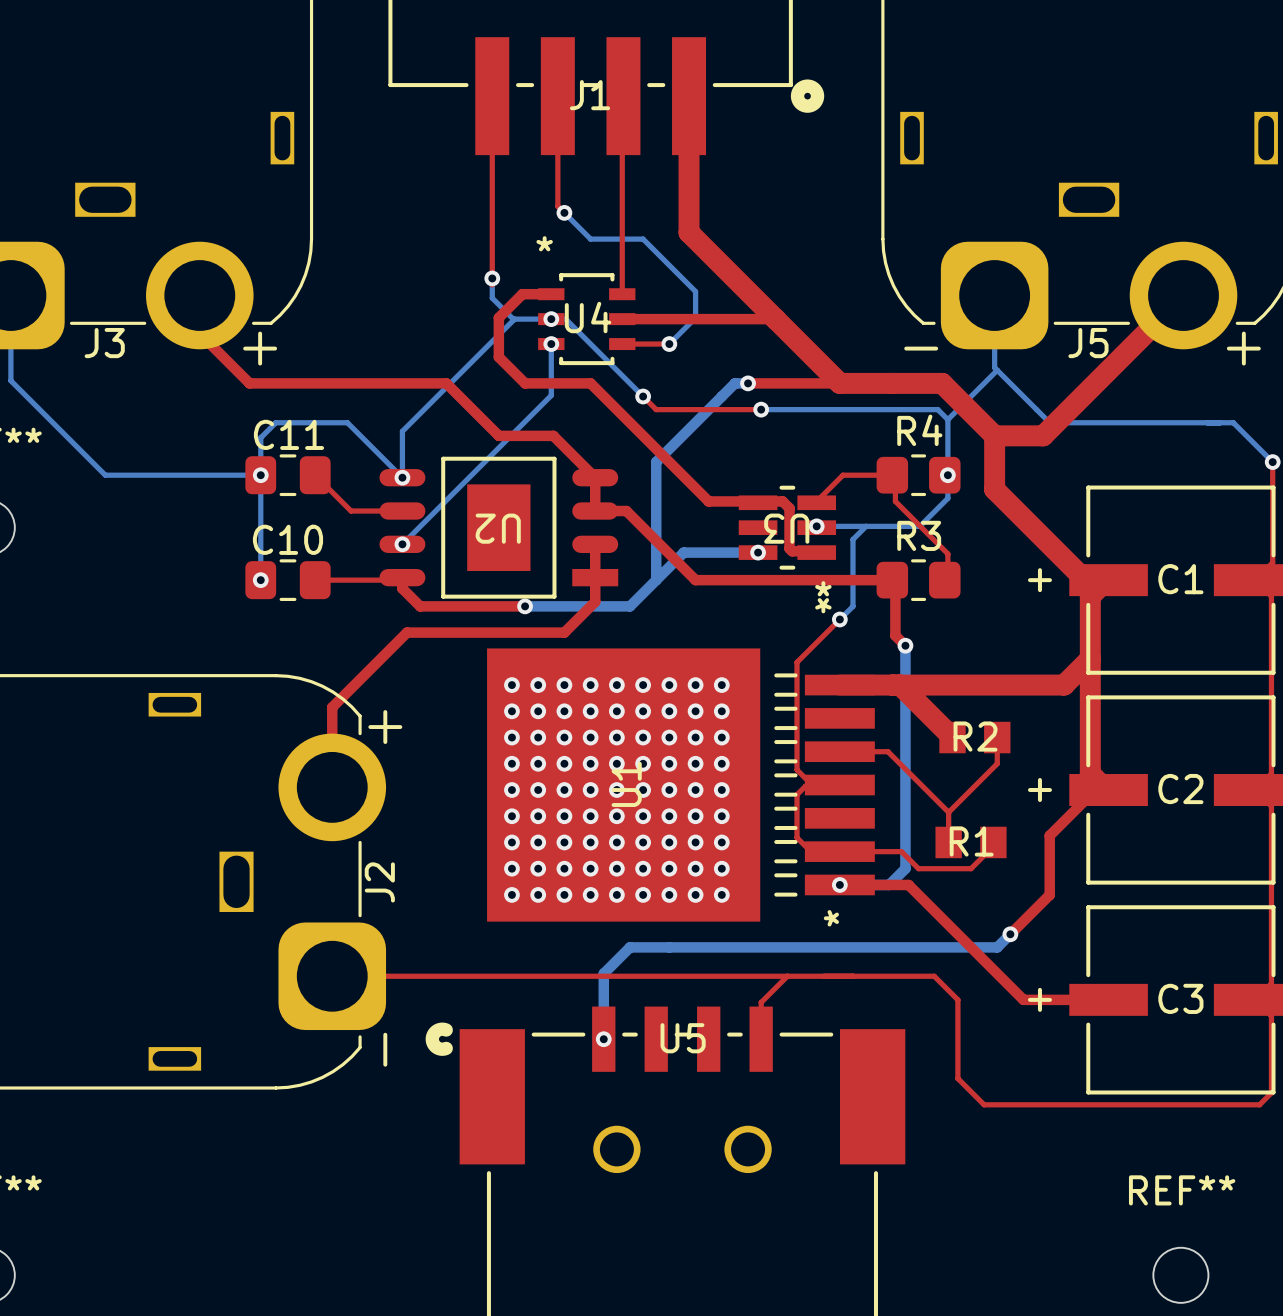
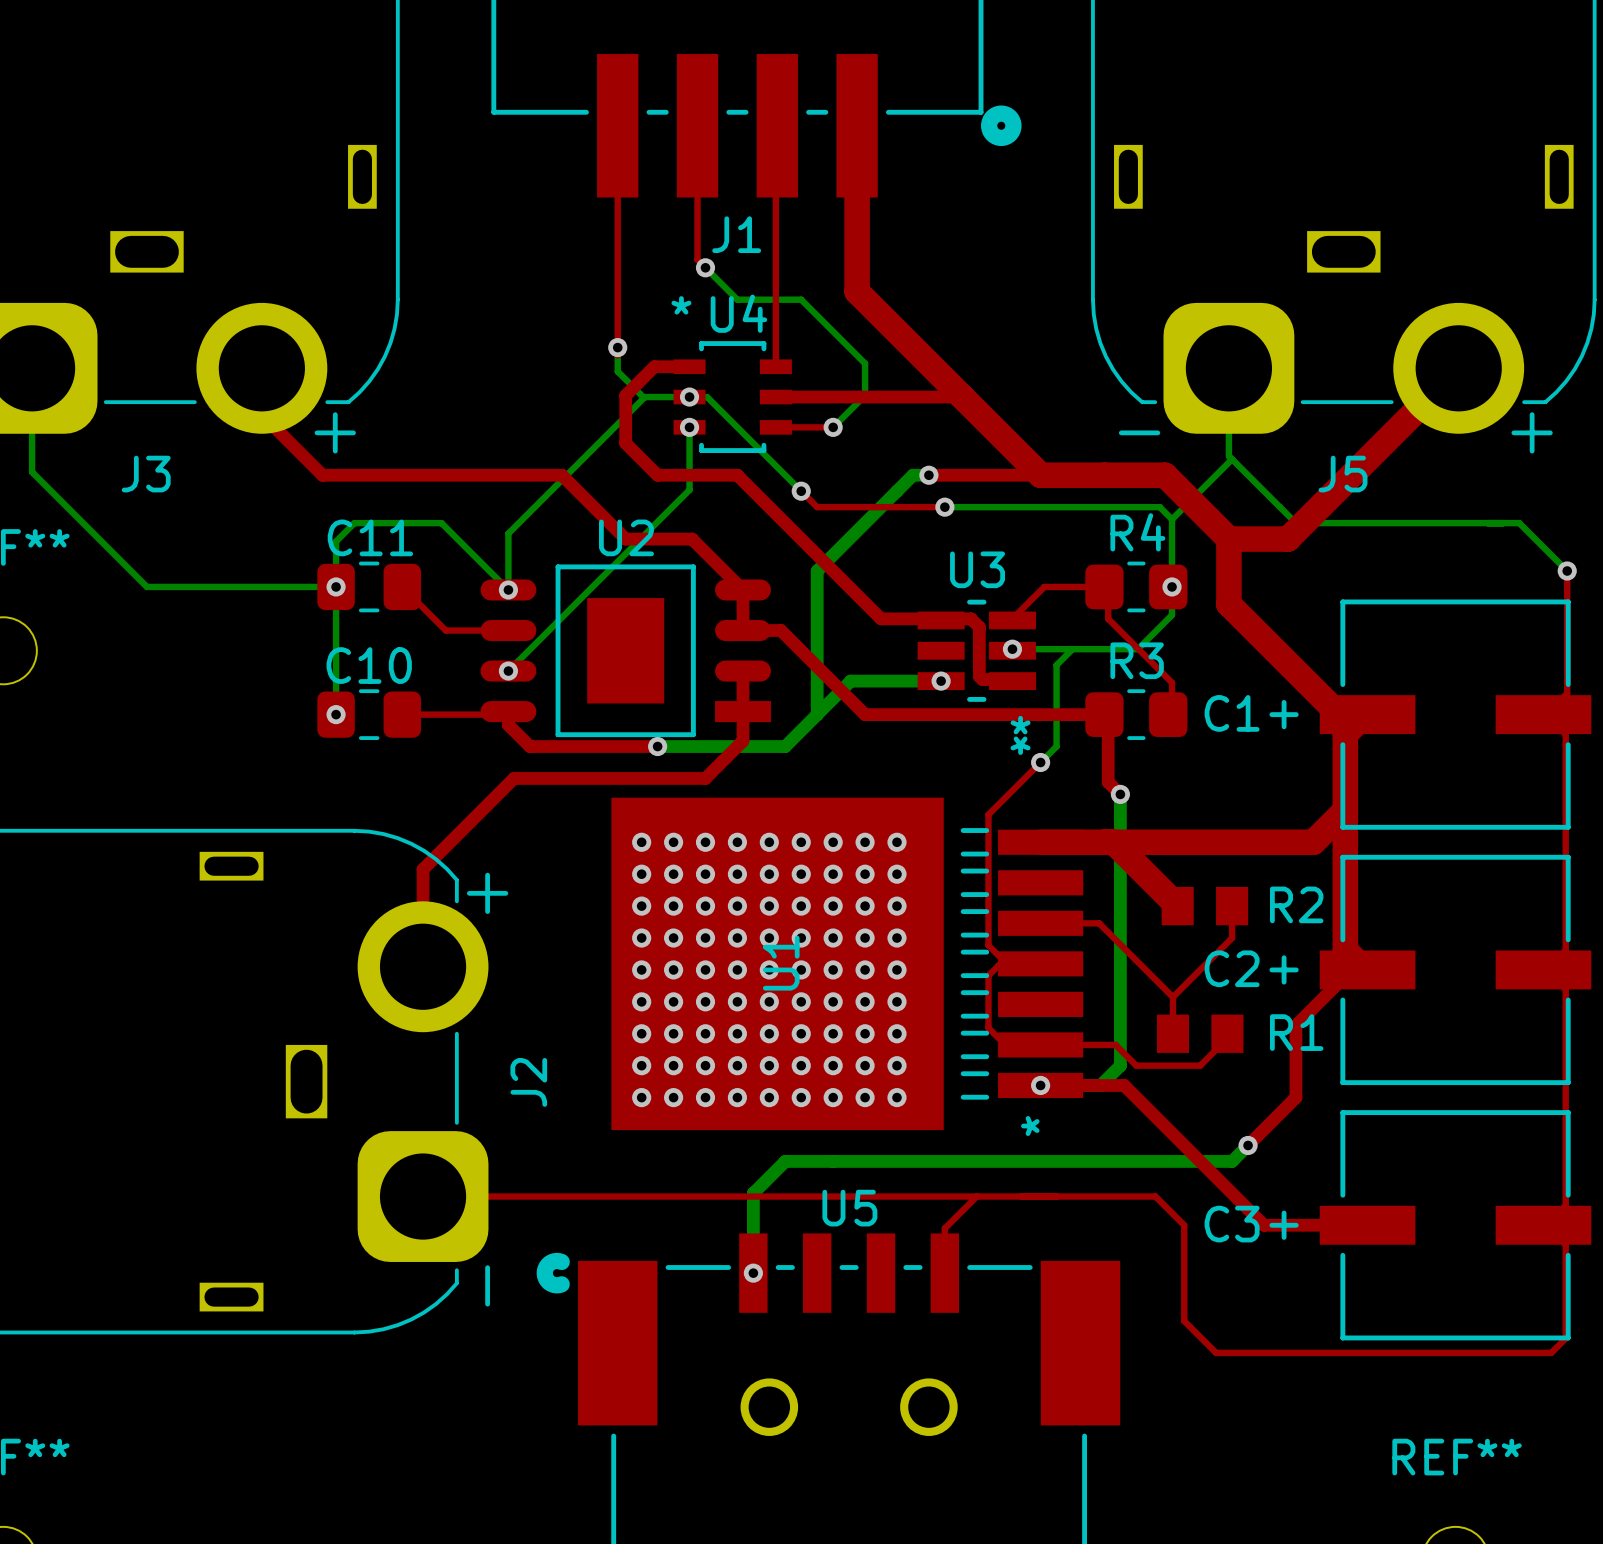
J1 name position: J1 (590, 95) -> J1 (736, 234)
U4 name position: U4 (588, 317) -> U4 (738, 313)
J3 name position: J3 (104, 343) -> J3 (146, 474)
J5 name position: J5 (1088, 343) -> J5 (1343, 474)
U2 name rotation: 0° (498, 528) -> 180° (626, 537)
U2 name position: U2 (498, 528) -> U2 (626, 537)
U3 name rotation: 0° (786, 528) -> 180° (977, 569)
C1 name position: C1 (1180, 579) -> C1 (1232, 713)
R2 name position: R2 (975, 736) -> R2 (1296, 904)
C2 name position: C2 (1180, 789) -> C2 (1232, 968)
R1 name position: R1 (971, 841) -> R1 (1296, 1032)
J2 name position: J2 (379, 882) -> J2 (528, 1082)
C3 name position: C3 (1180, 998) -> C3 (1232, 1224)
U5 name position: U5 (683, 1038) -> U5 (849, 1208)

